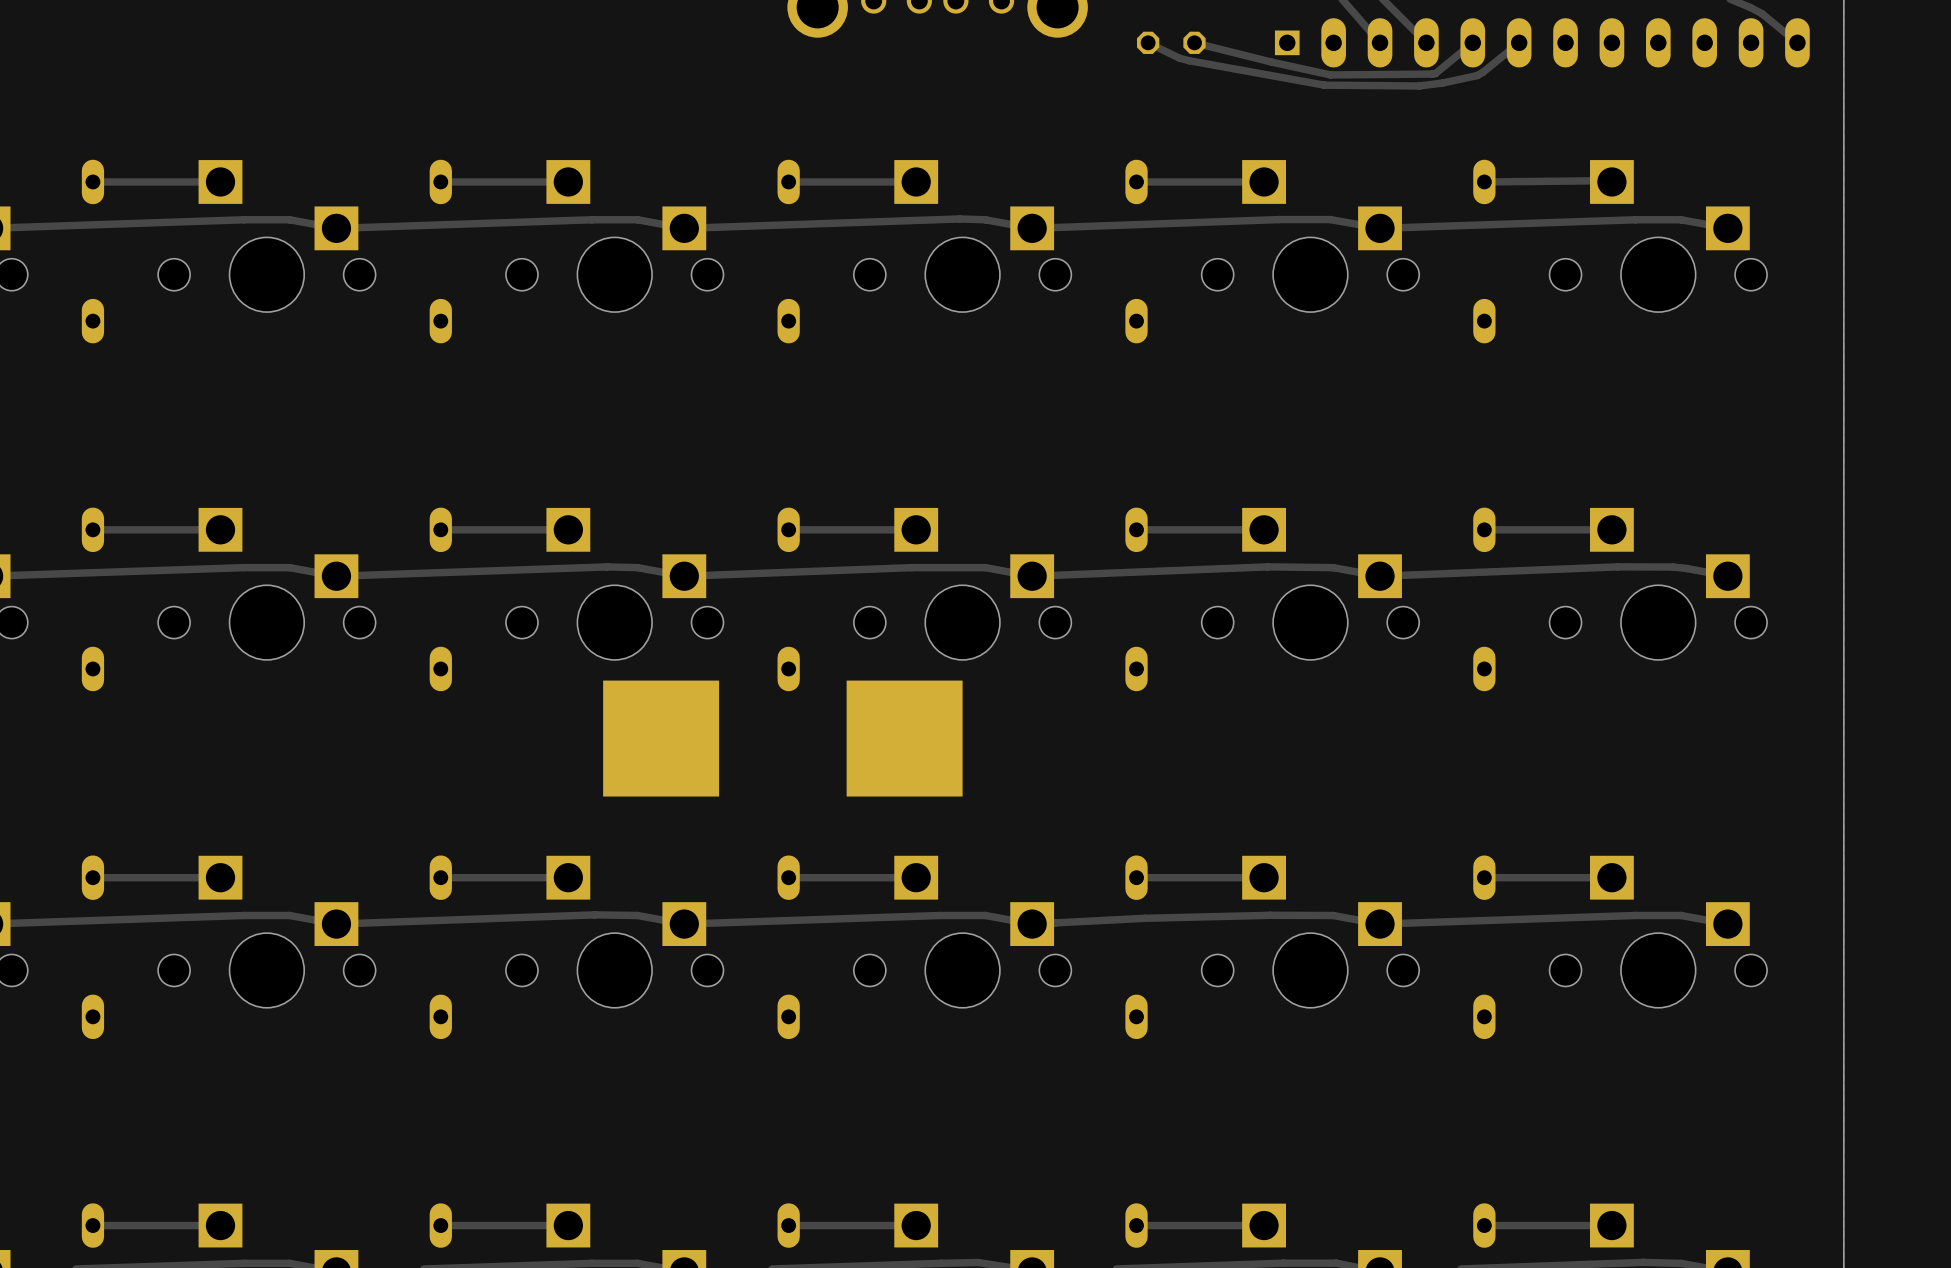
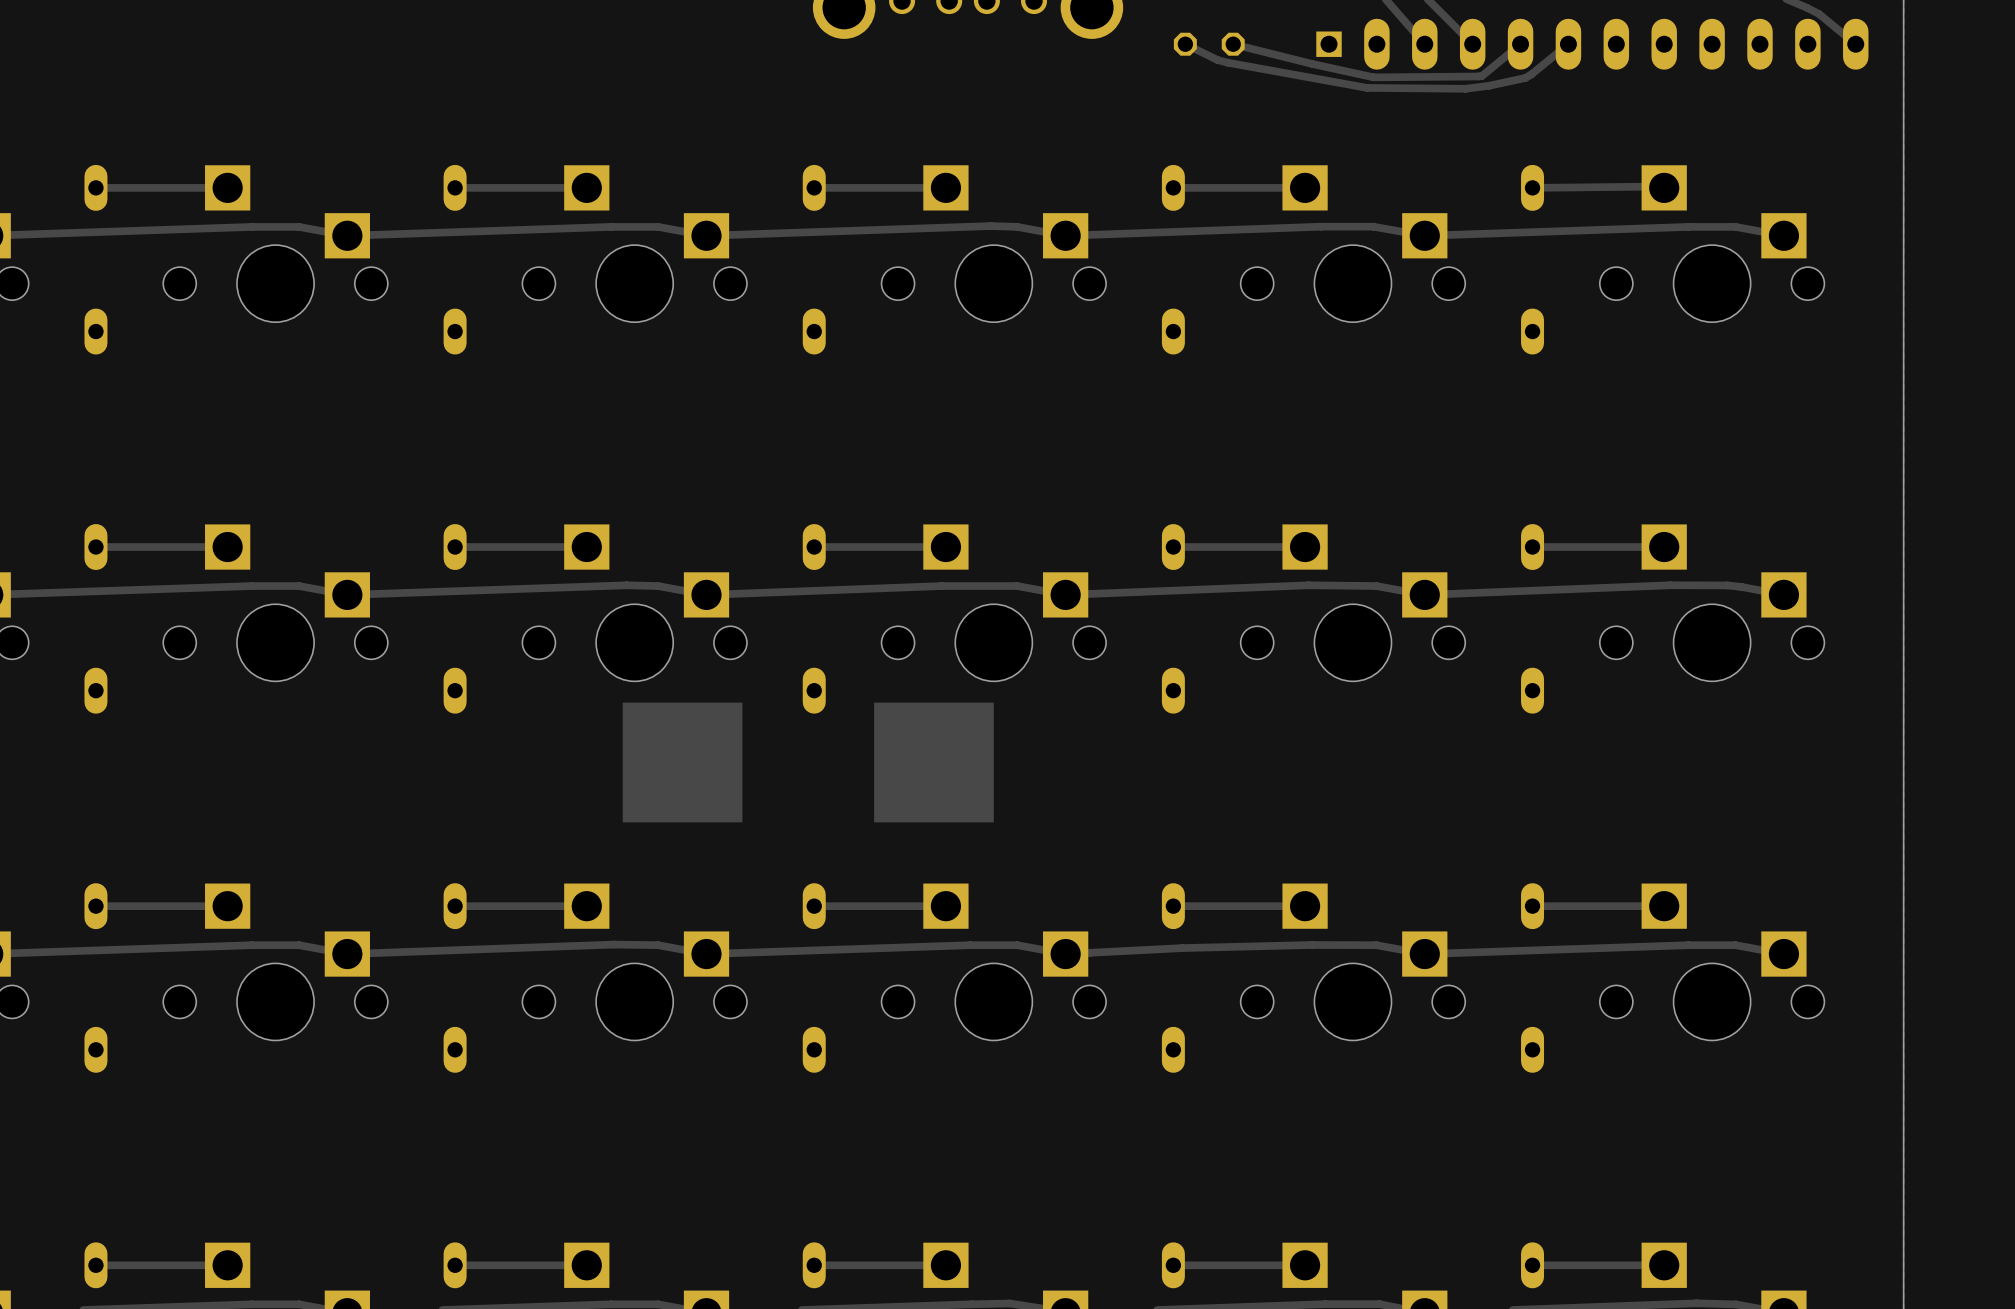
drawing: none -> [622, 702, 743, 823]
drawing: none -> [874, 702, 994, 823]
part: (661, 738) -> none
part: (904, 738) -> none

